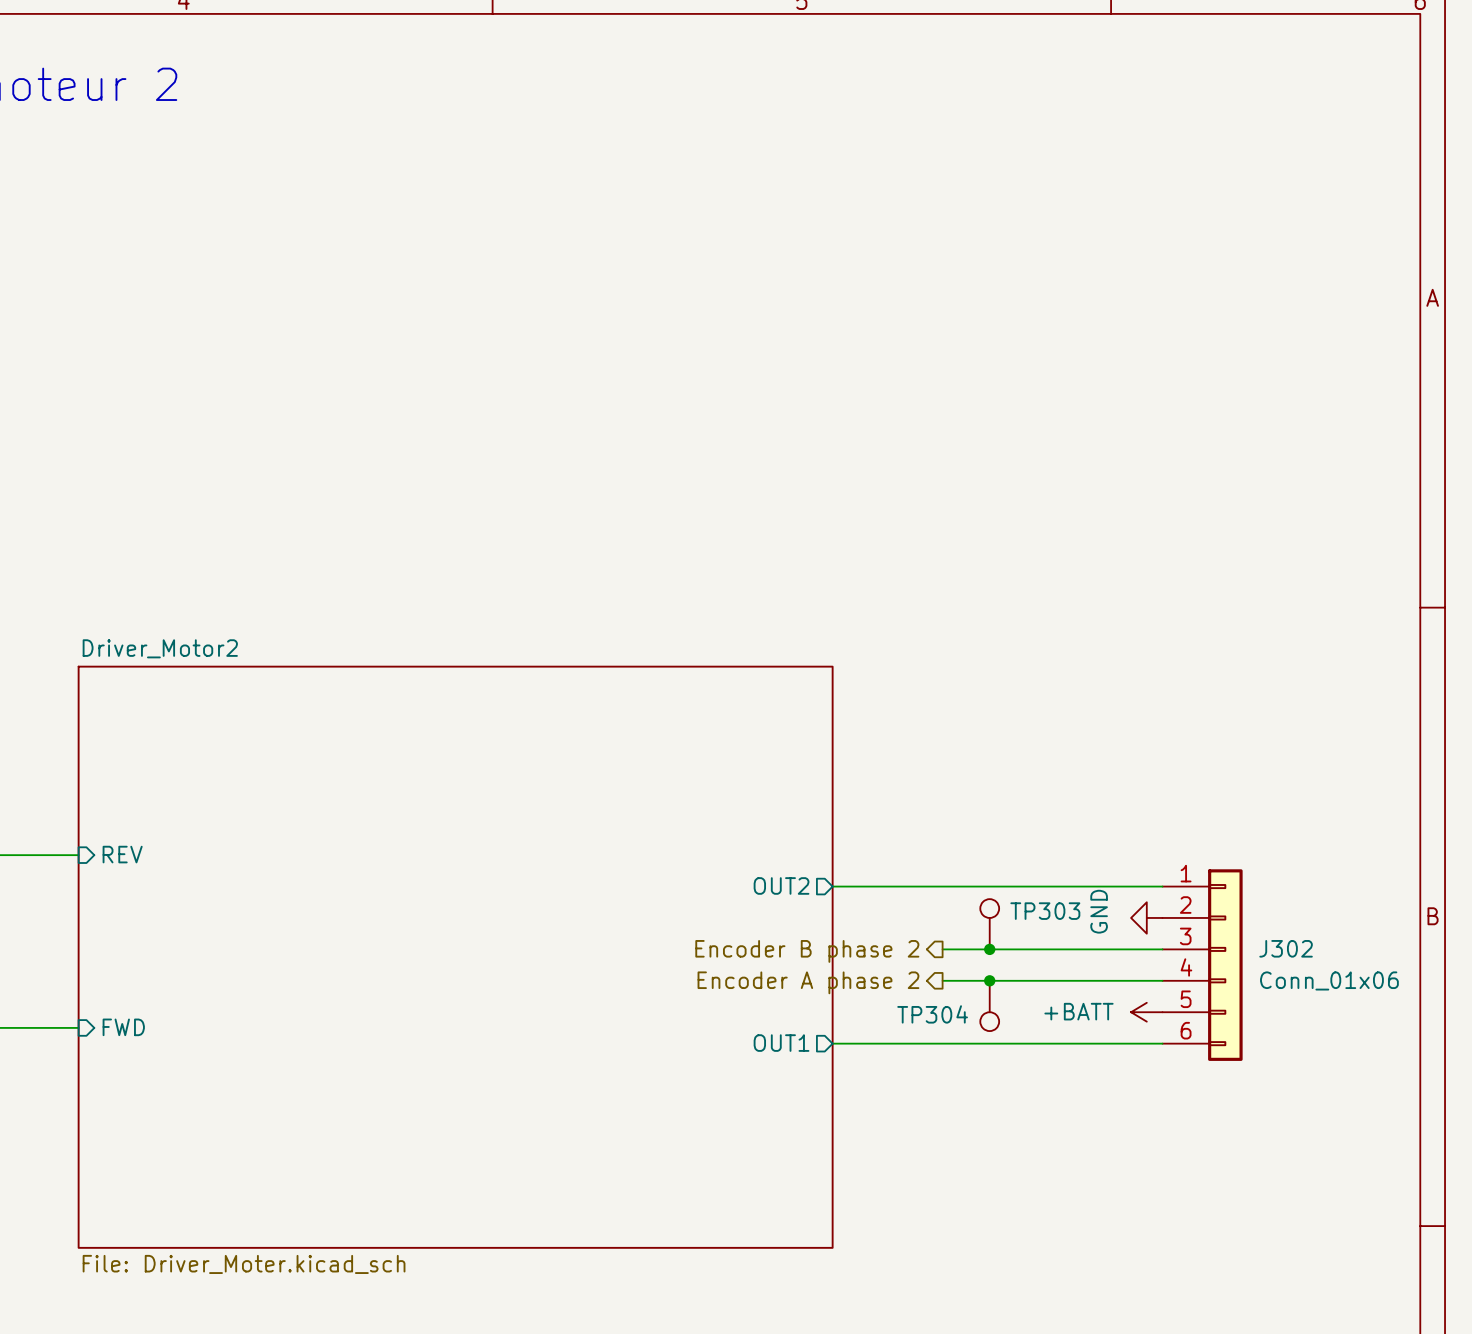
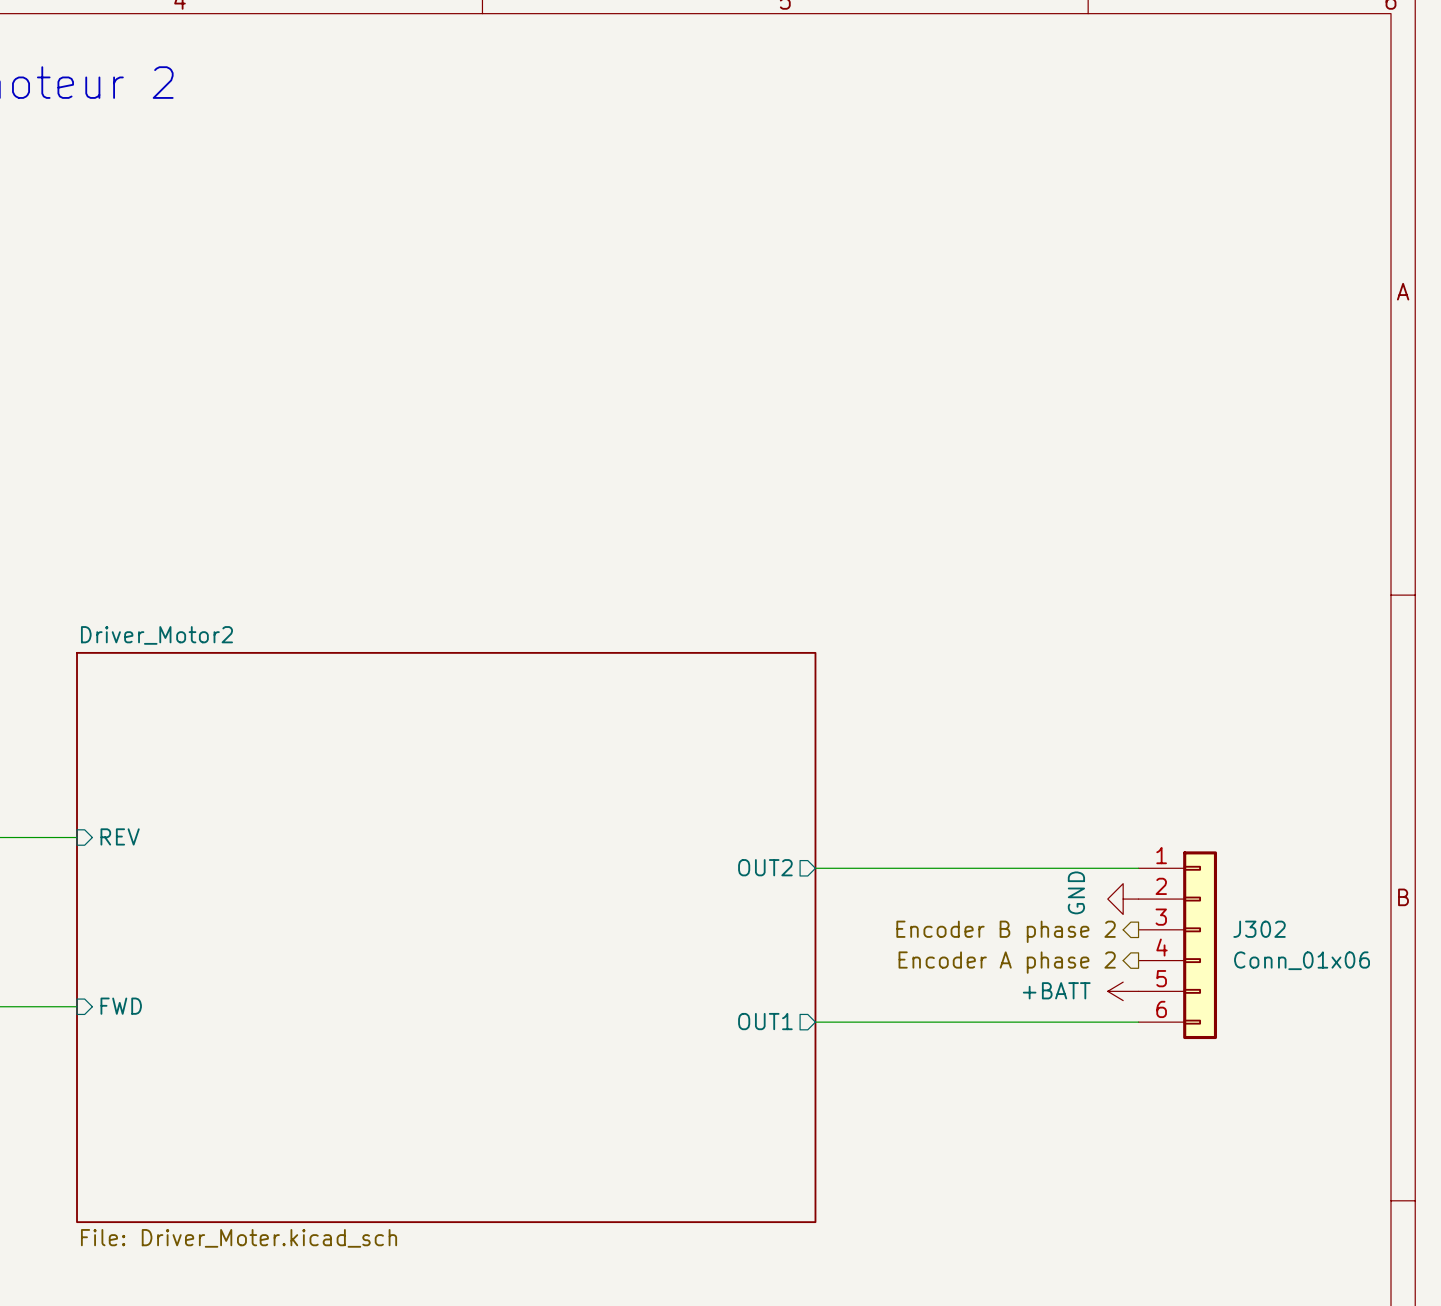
TP303: (989, 924) -> none
wire: (942, 949) (1162, 949) -> none
junction: (989, 949) -> none
hierarchical label position: Encoder B phase 2 (807, 951) -> Encoder B phase 2 (1006, 931)
wire: (942, 980) (1162, 980) -> none
junction: (989, 980) -> none
hierarchical label position: Encoder A phase 2 (808, 982) -> Encoder A phase 2 (1007, 962)
TP304: (989, 1005) -> none

